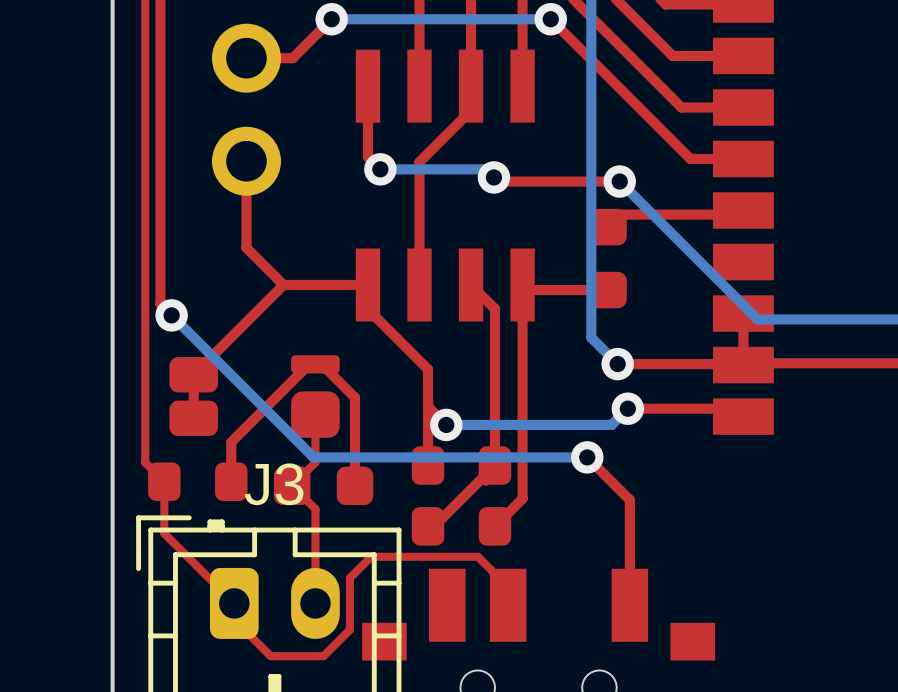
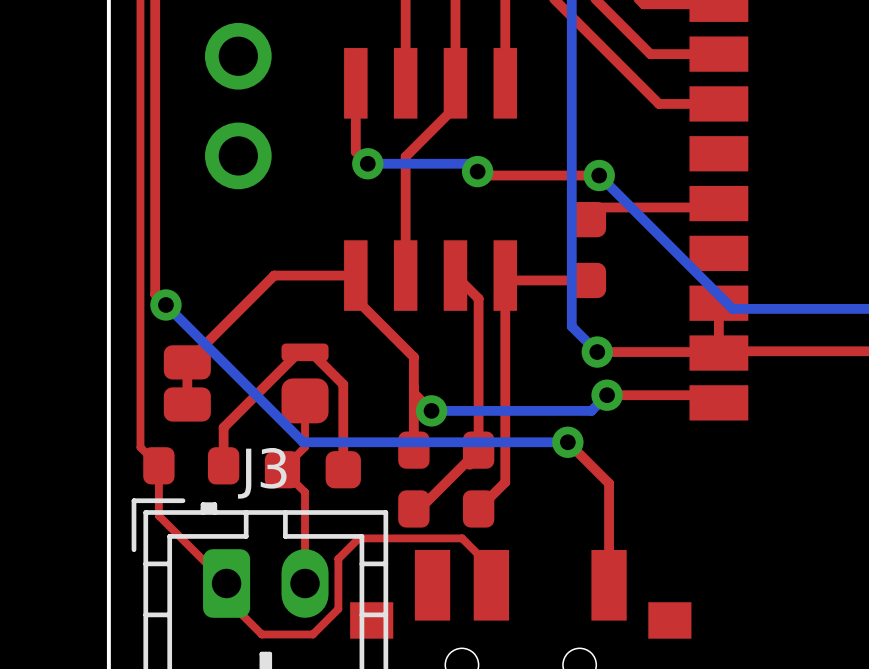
top track: (331, 19) (292, 58) (246, 58) -> none
via: (331, 19) -> none
top track: (550, 19) (690, 159) (743, 159) -> none
bottom track: (550, 19) (331, 19) -> none
via: (550, 19) -> none
top track: (246, 161) (246, 247) (283, 284) -> none

